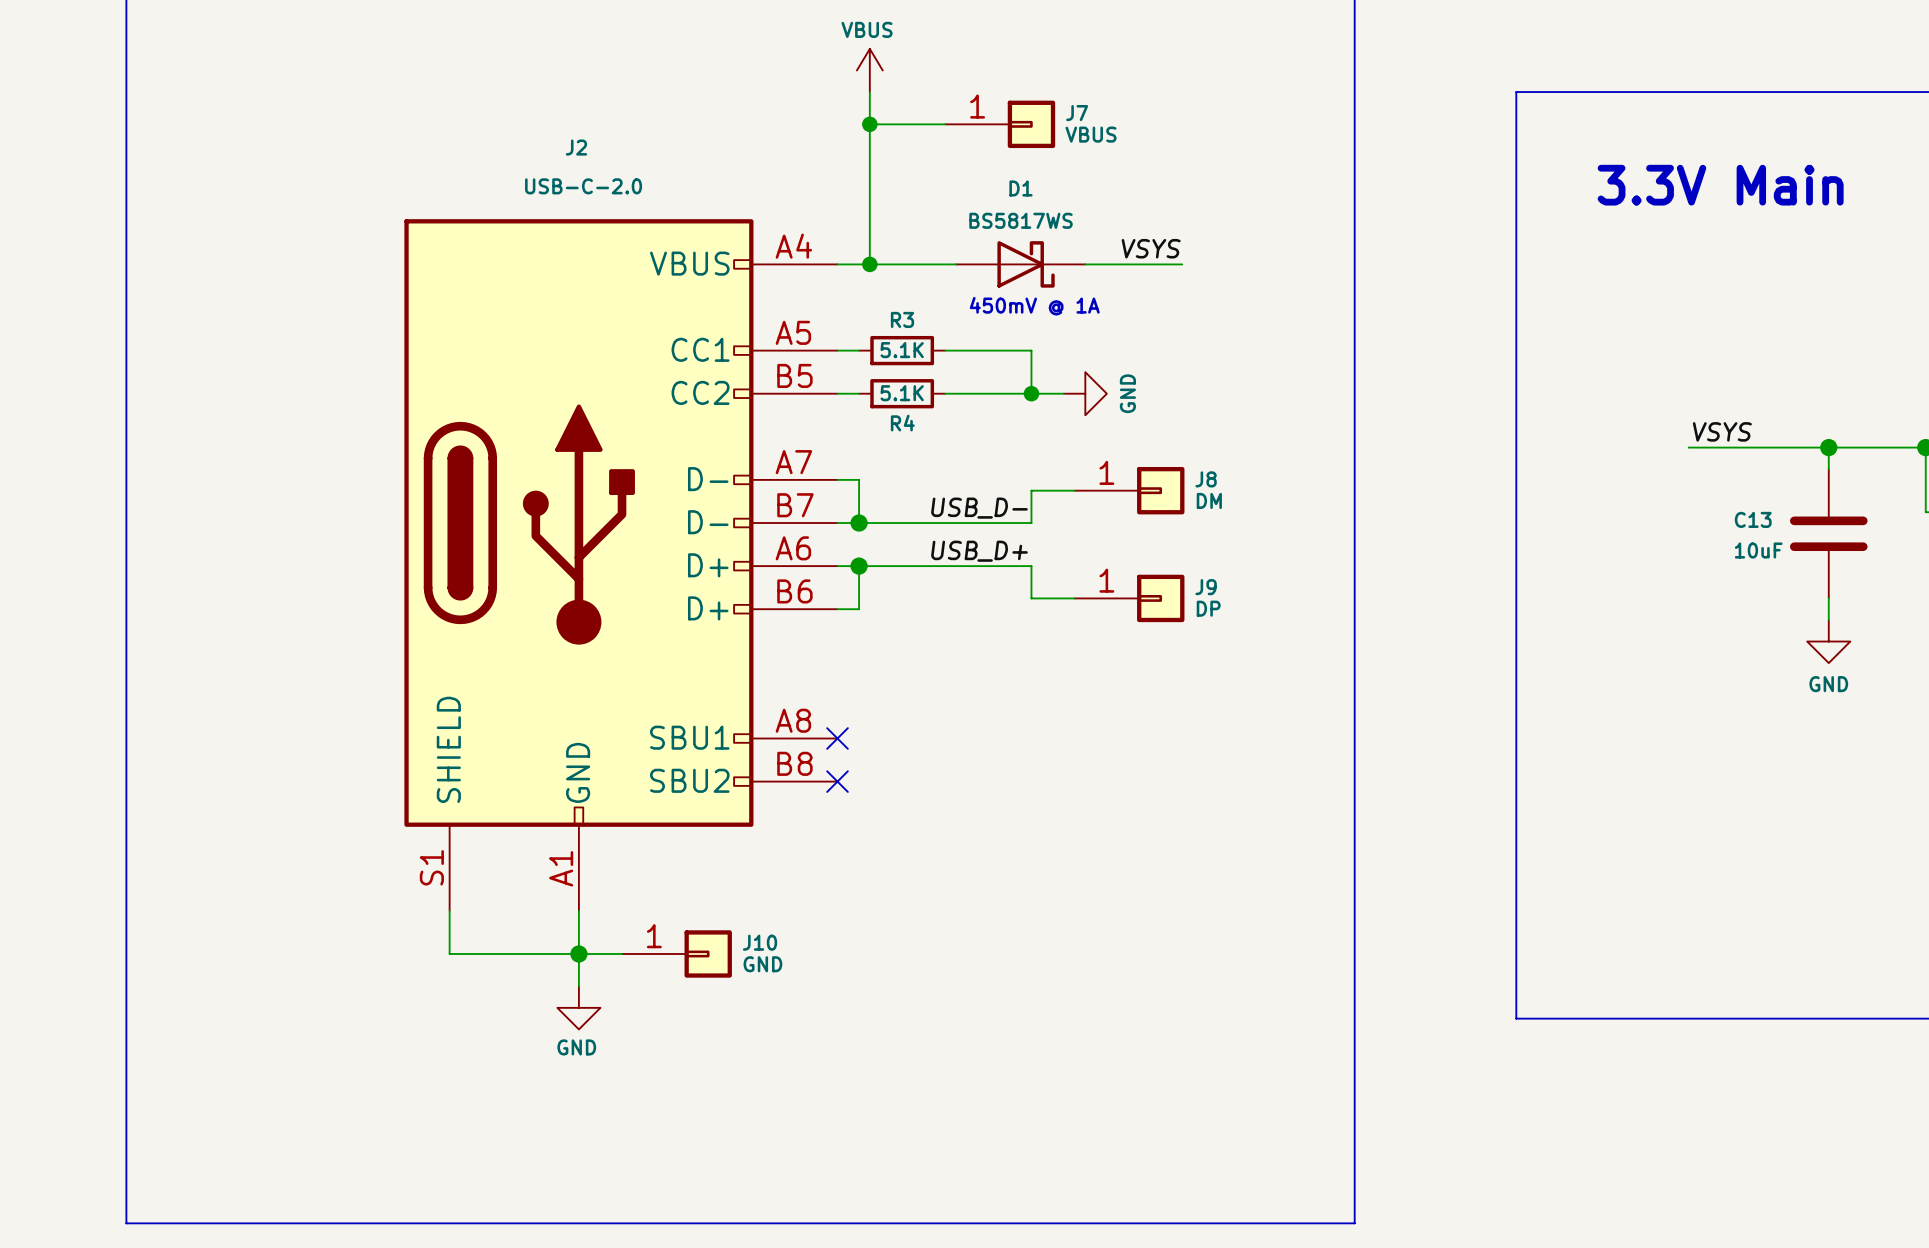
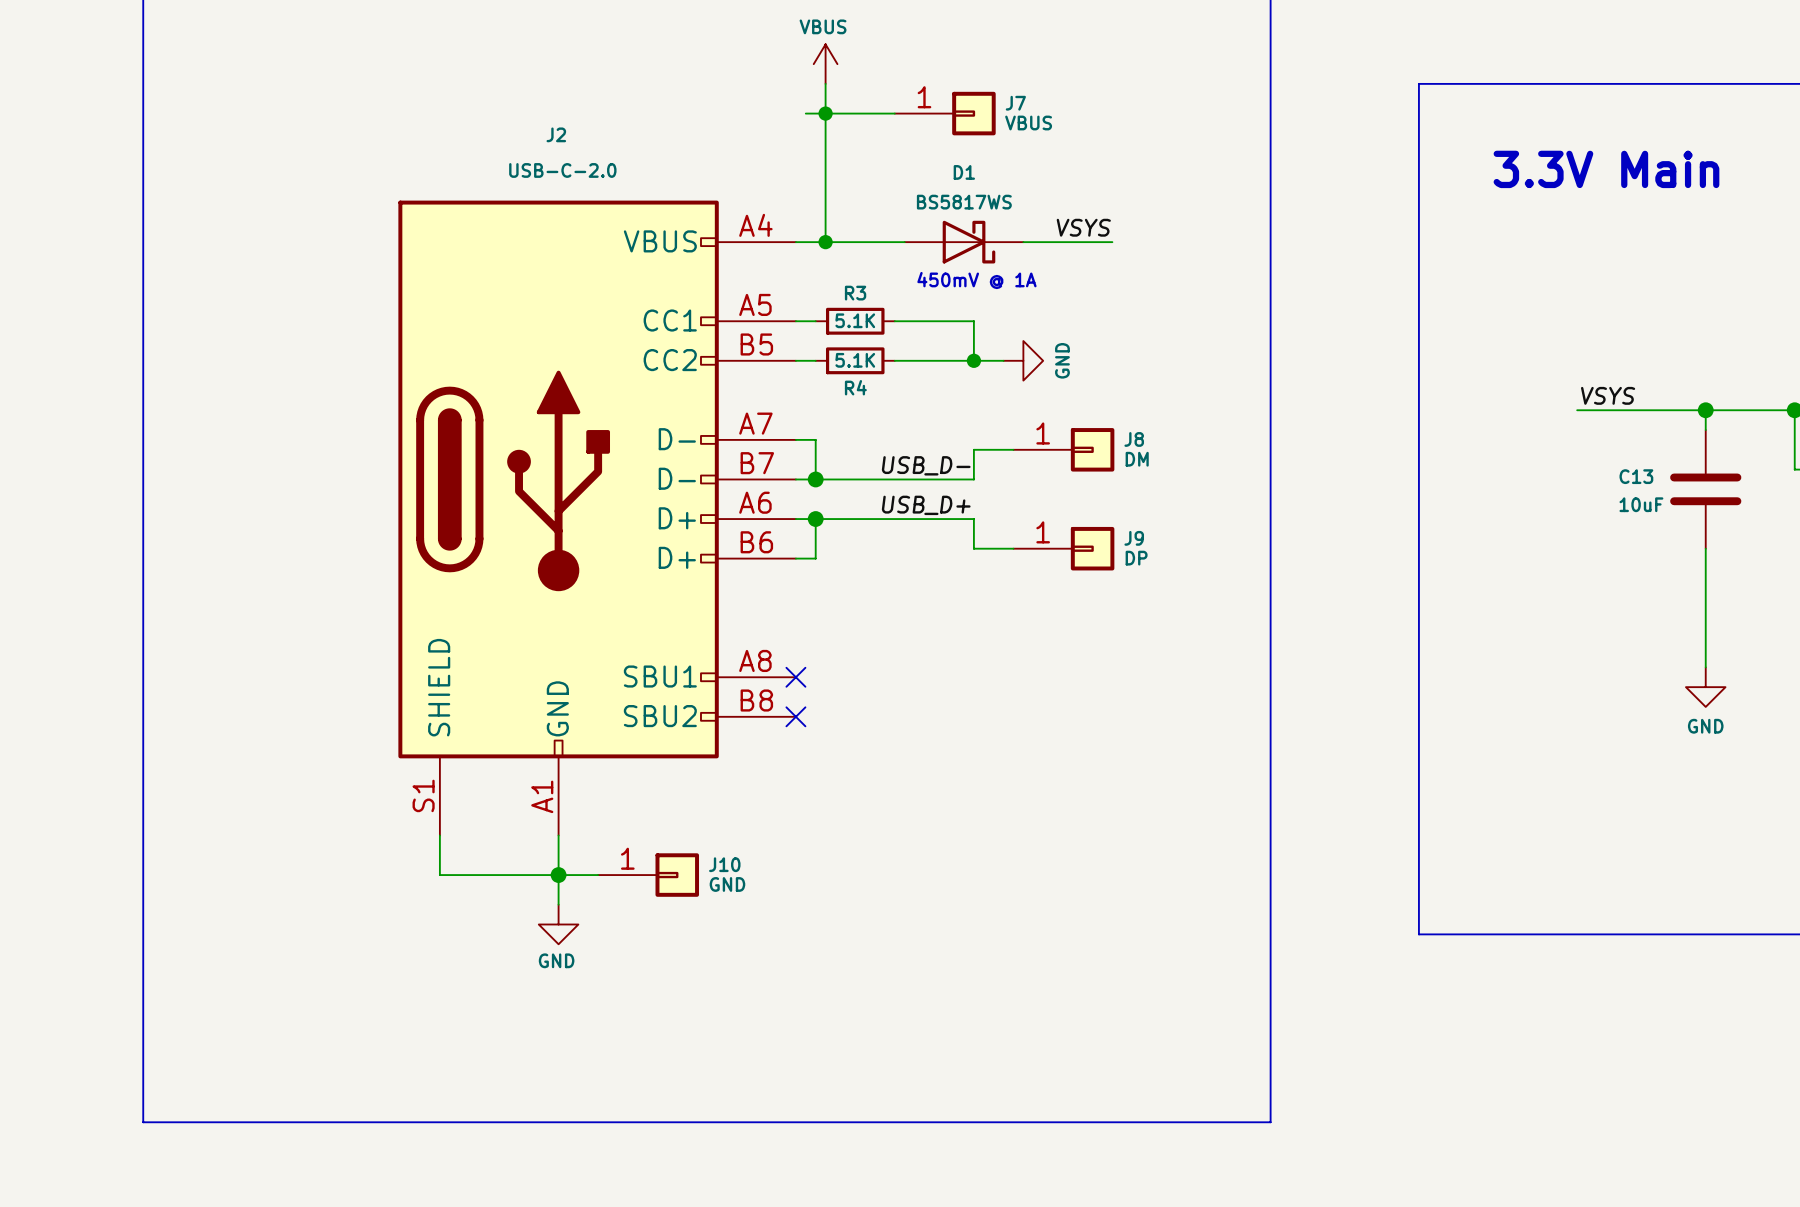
wire: none -> (805, 113) (825, 113)
wire: none -> (1705, 568) (1705, 667)
power symbol position: GND (1828, 641) -> GND (1705, 687)

